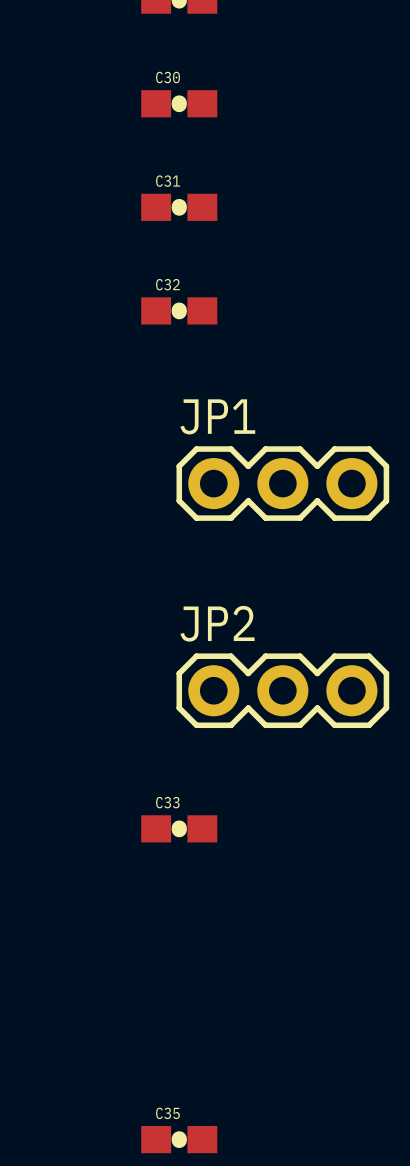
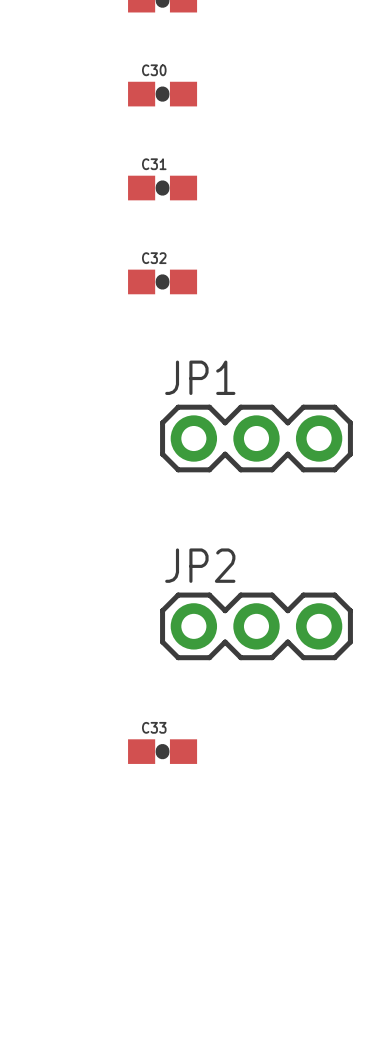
C35: (179, 1139) -> none

